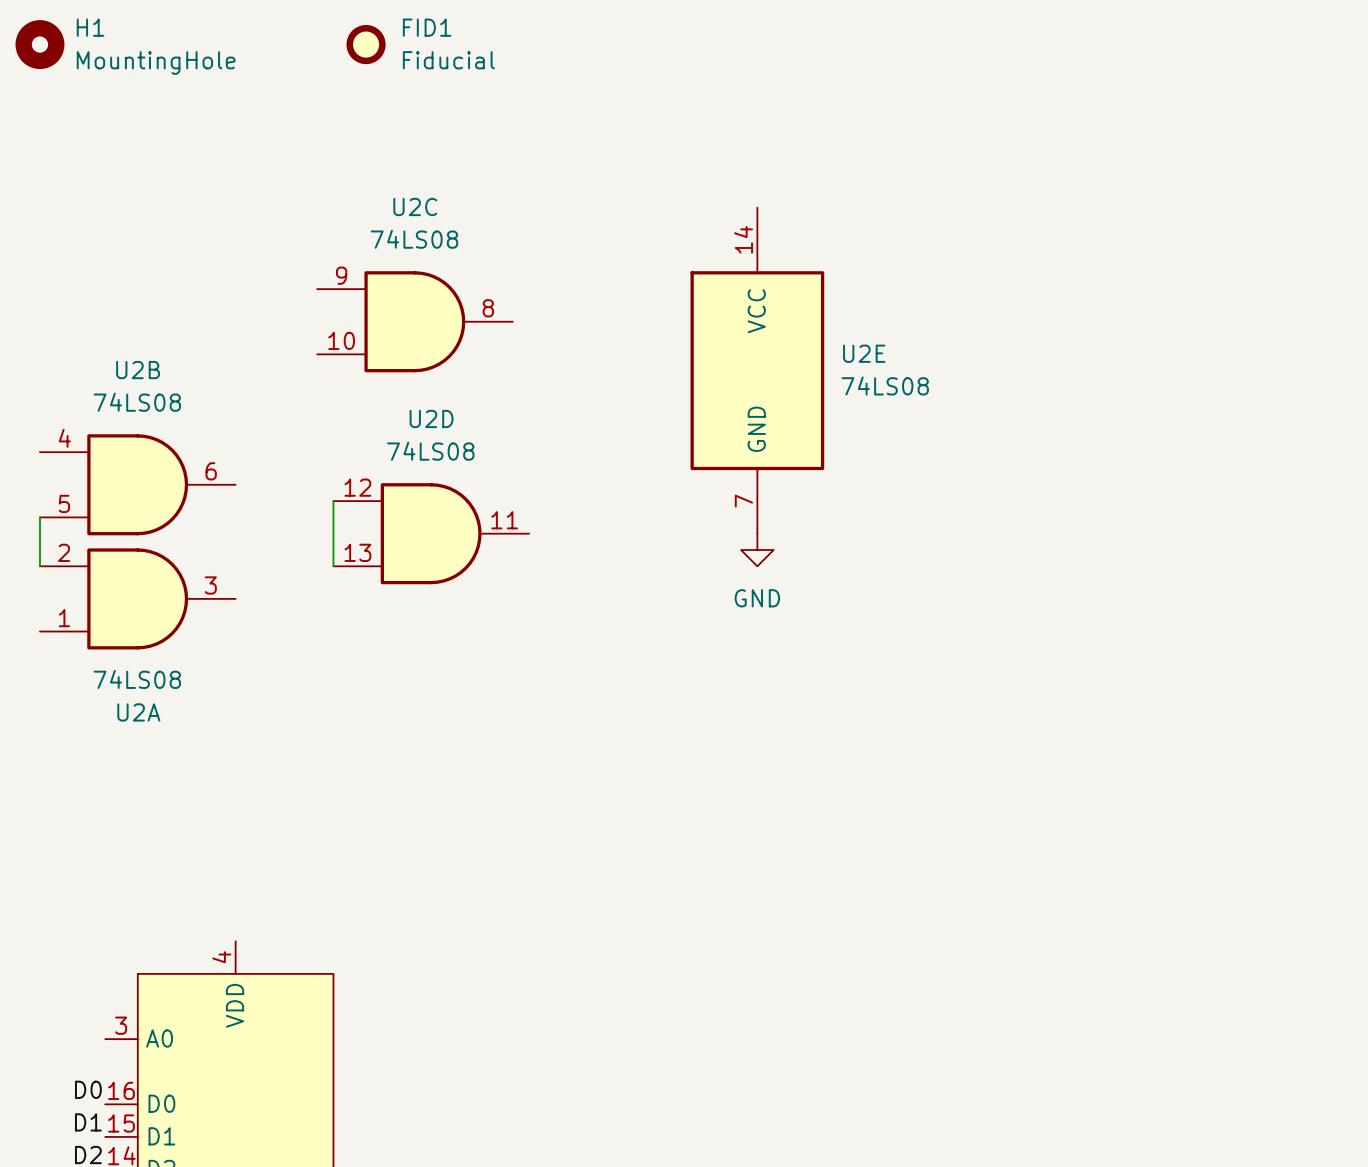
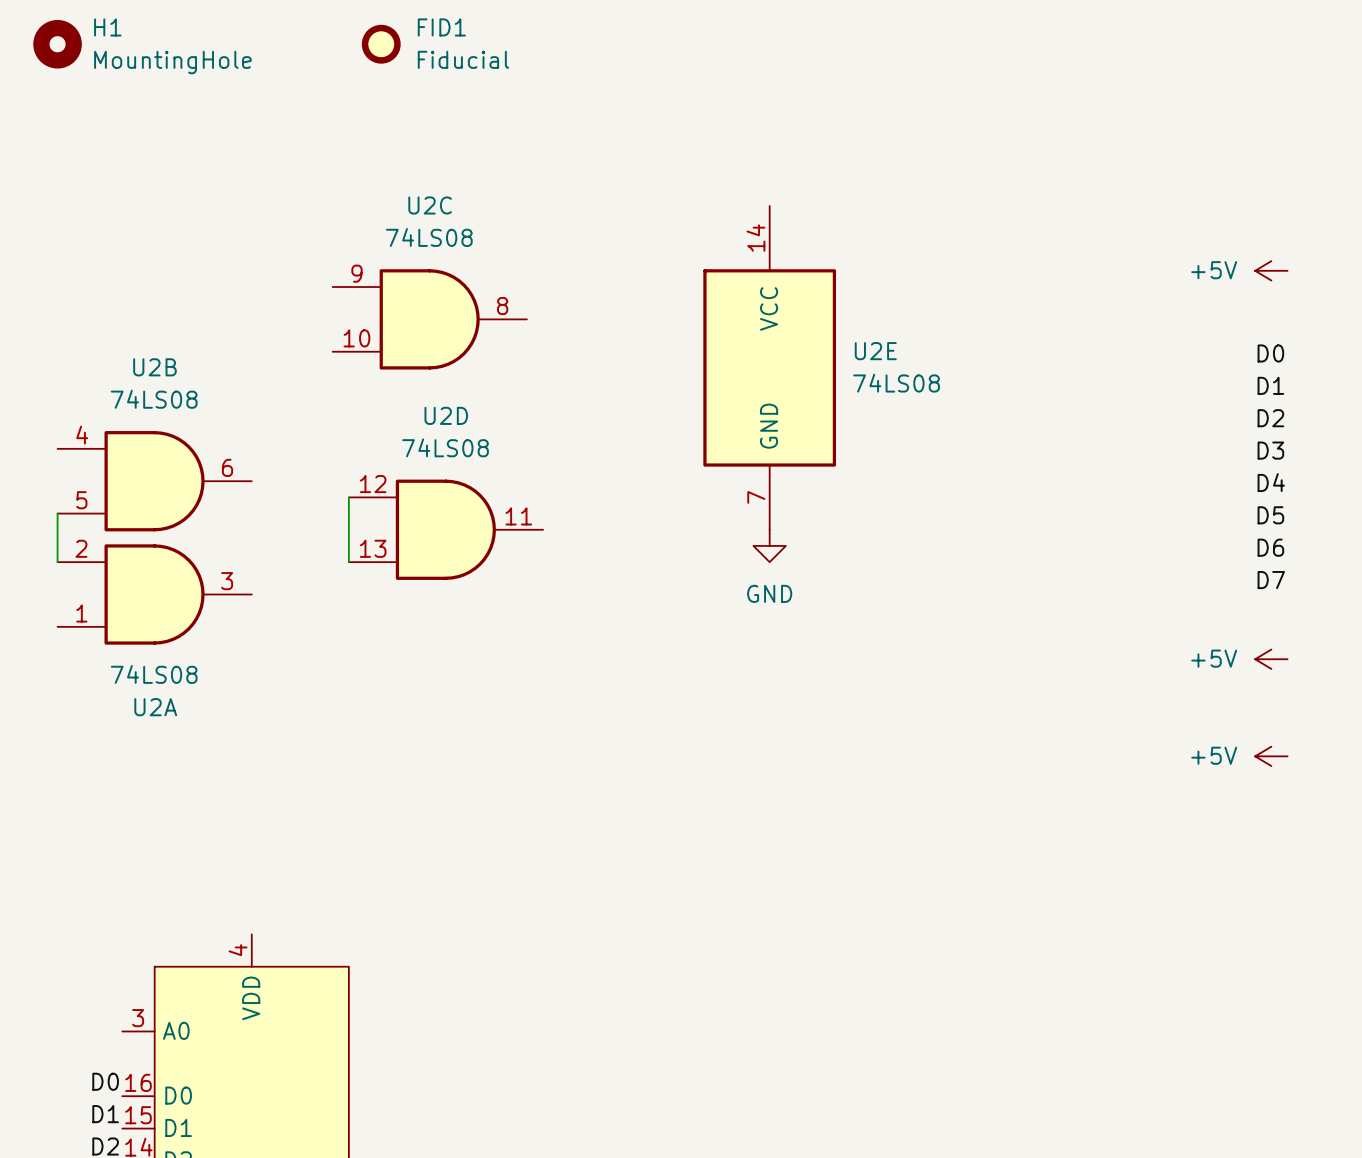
power symbol: none -> +5V (1271, 270)
label: none -> D0 (1270, 353)
label: none -> D1 (1270, 385)
label: none -> D2 (1270, 418)
label: none -> D3 (1270, 450)
label: none -> D4 (1271, 482)
label: none -> D5 (1270, 515)
label: none -> D6 (1270, 547)
label: none -> D7 (1271, 580)
power symbol: none -> +5V (1271, 659)
power symbol: none -> +5V (1271, 756)

